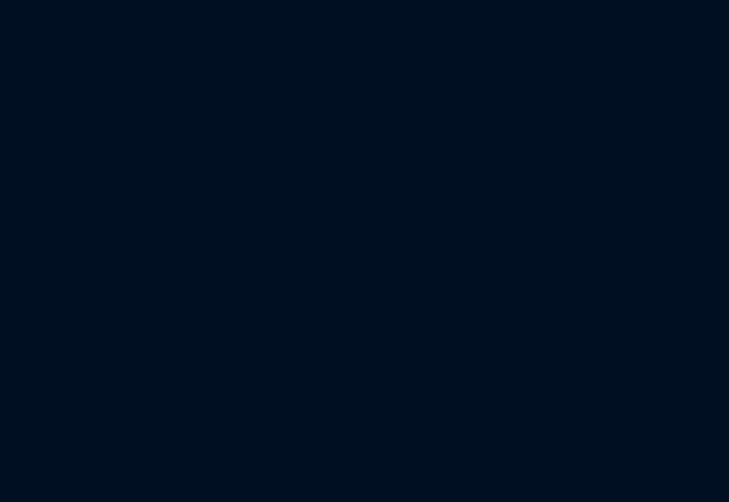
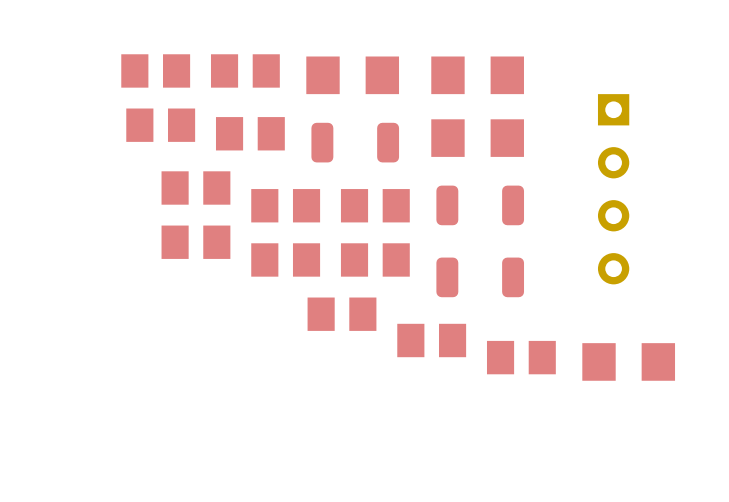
part: none -> (155, 70)
part: none -> (245, 70)
part: none -> (352, 75)
part: none -> (477, 75)
part: none -> (160, 125)
part: none -> (250, 133)
part: none -> (477, 138)
part: none -> (355, 142)
part: none -> (195, 188)
part: none -> (613, 189)
part: none -> (285, 205)
part: none -> (375, 205)
part: none -> (480, 205)
part: none -> (195, 242)
part: none -> (285, 259)
part: none -> (375, 259)
part: none -> (480, 277)
part: none -> (341, 314)
part: none -> (431, 340)
part: none -> (521, 357)
part: none -> (628, 361)

